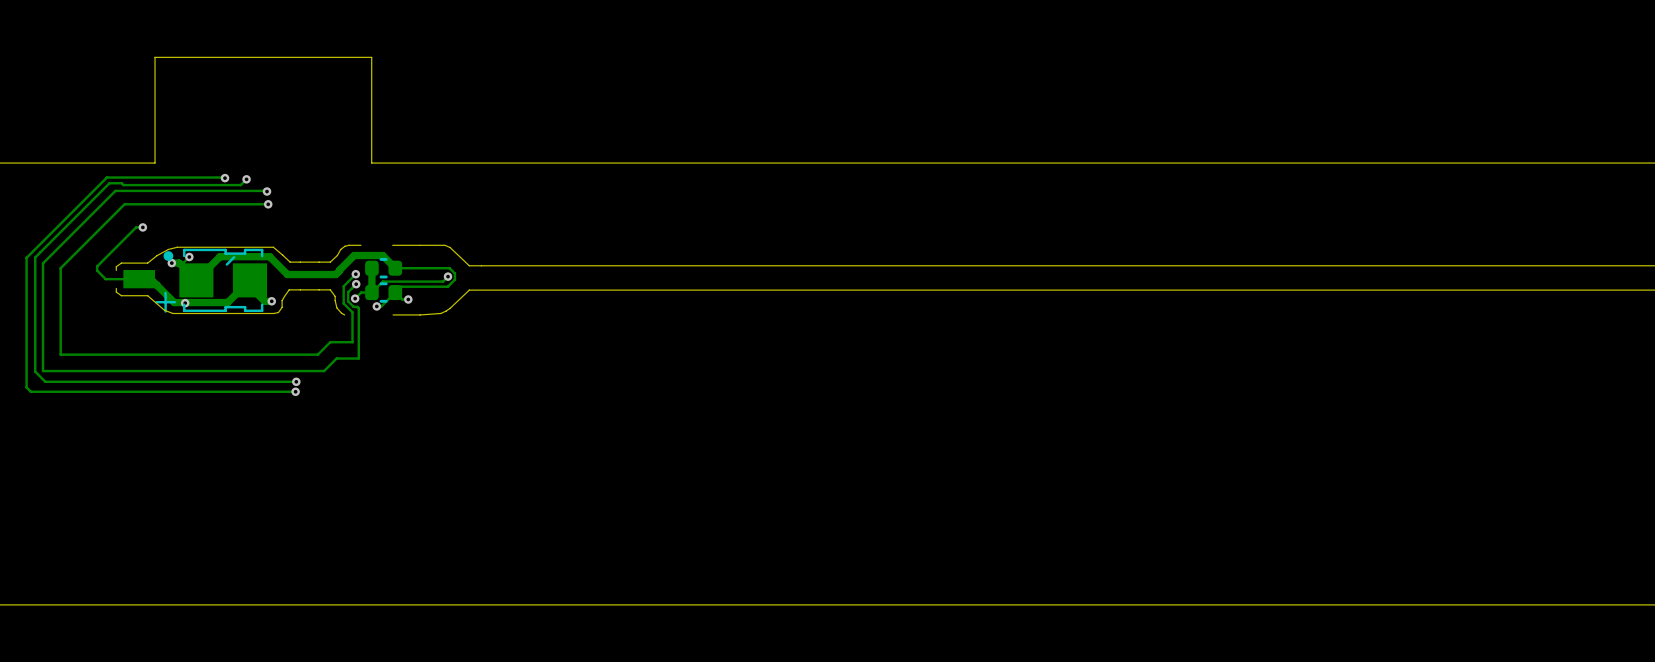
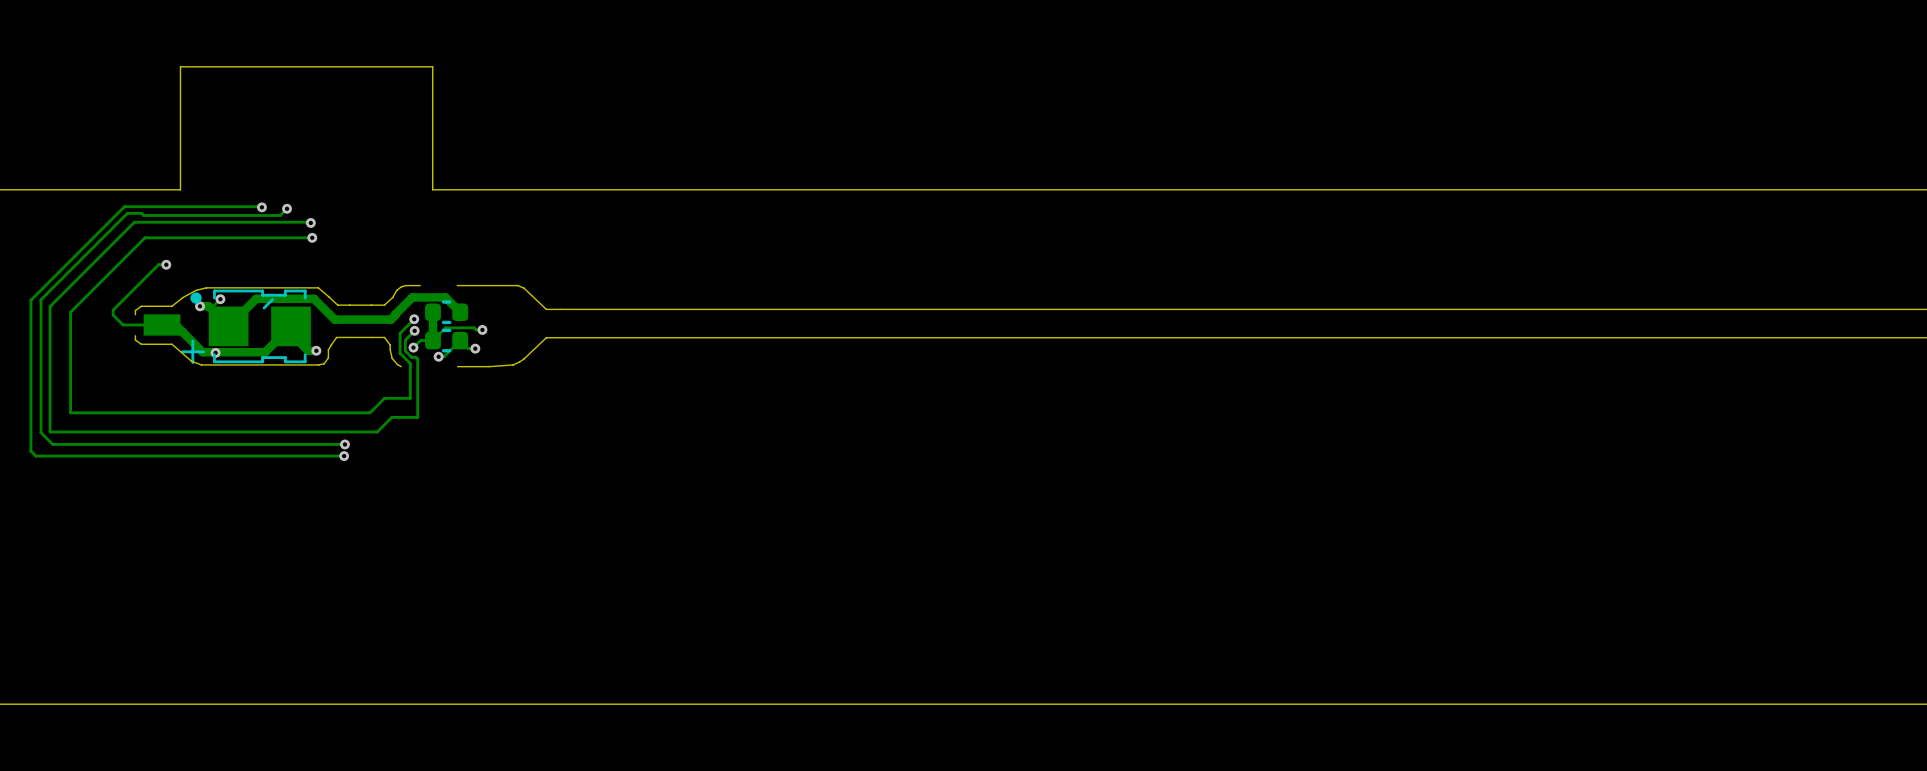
track: (395, 268) (449, 268) (454, 273) (454, 279) (447, 286) (401, 286) (395, 292) -> none
track: (445, 275) (448, 276) (443, 281) (407, 281) -> (482, 329) (476, 329) (474, 327)
via position: (448, 276) -> (482, 329)

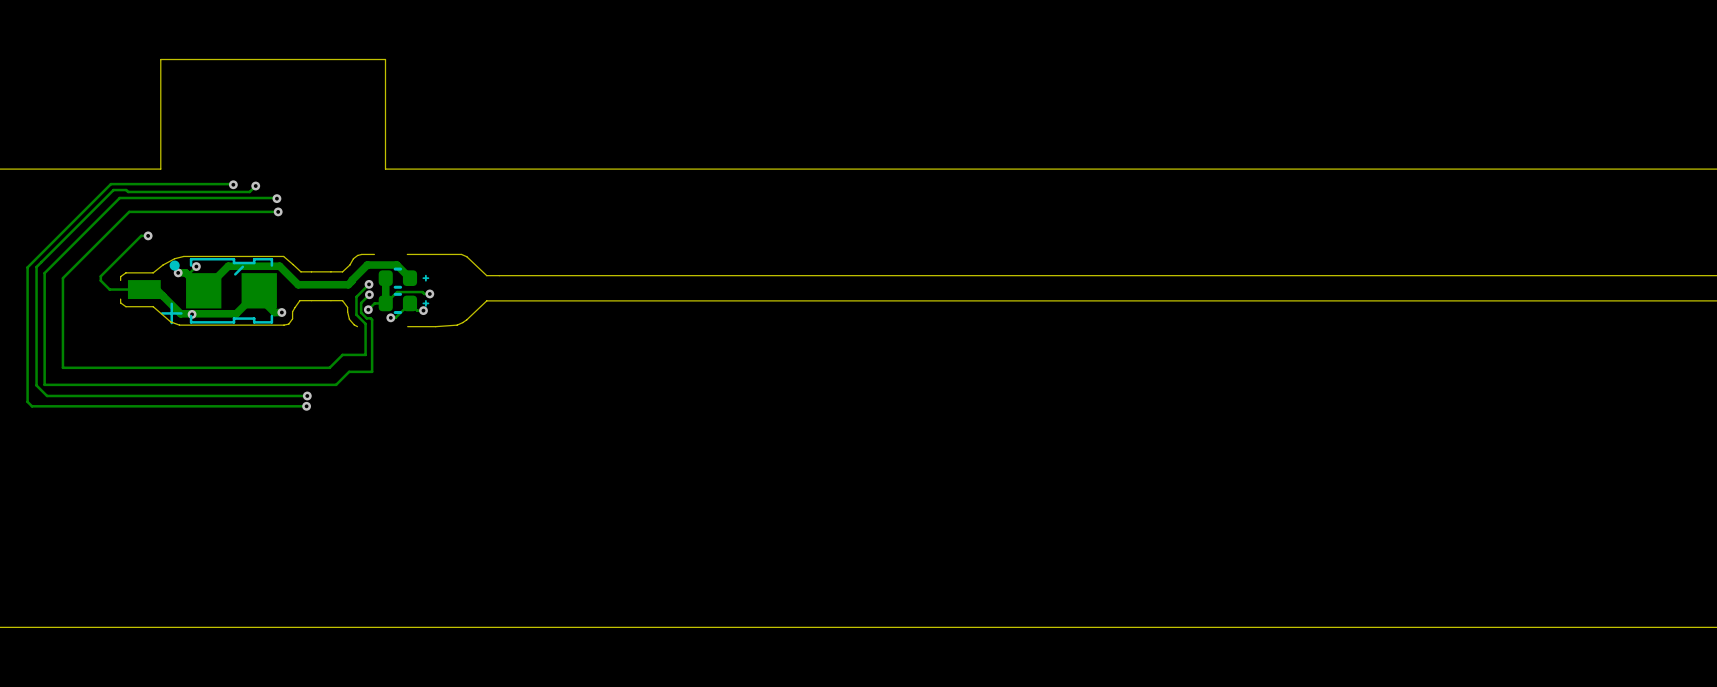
line: none -> (425, 275) (425, 280)
line: none -> (428, 278) (423, 278)
line: none -> (425, 300) (425, 305)
line: none -> (428, 303) (423, 303)

